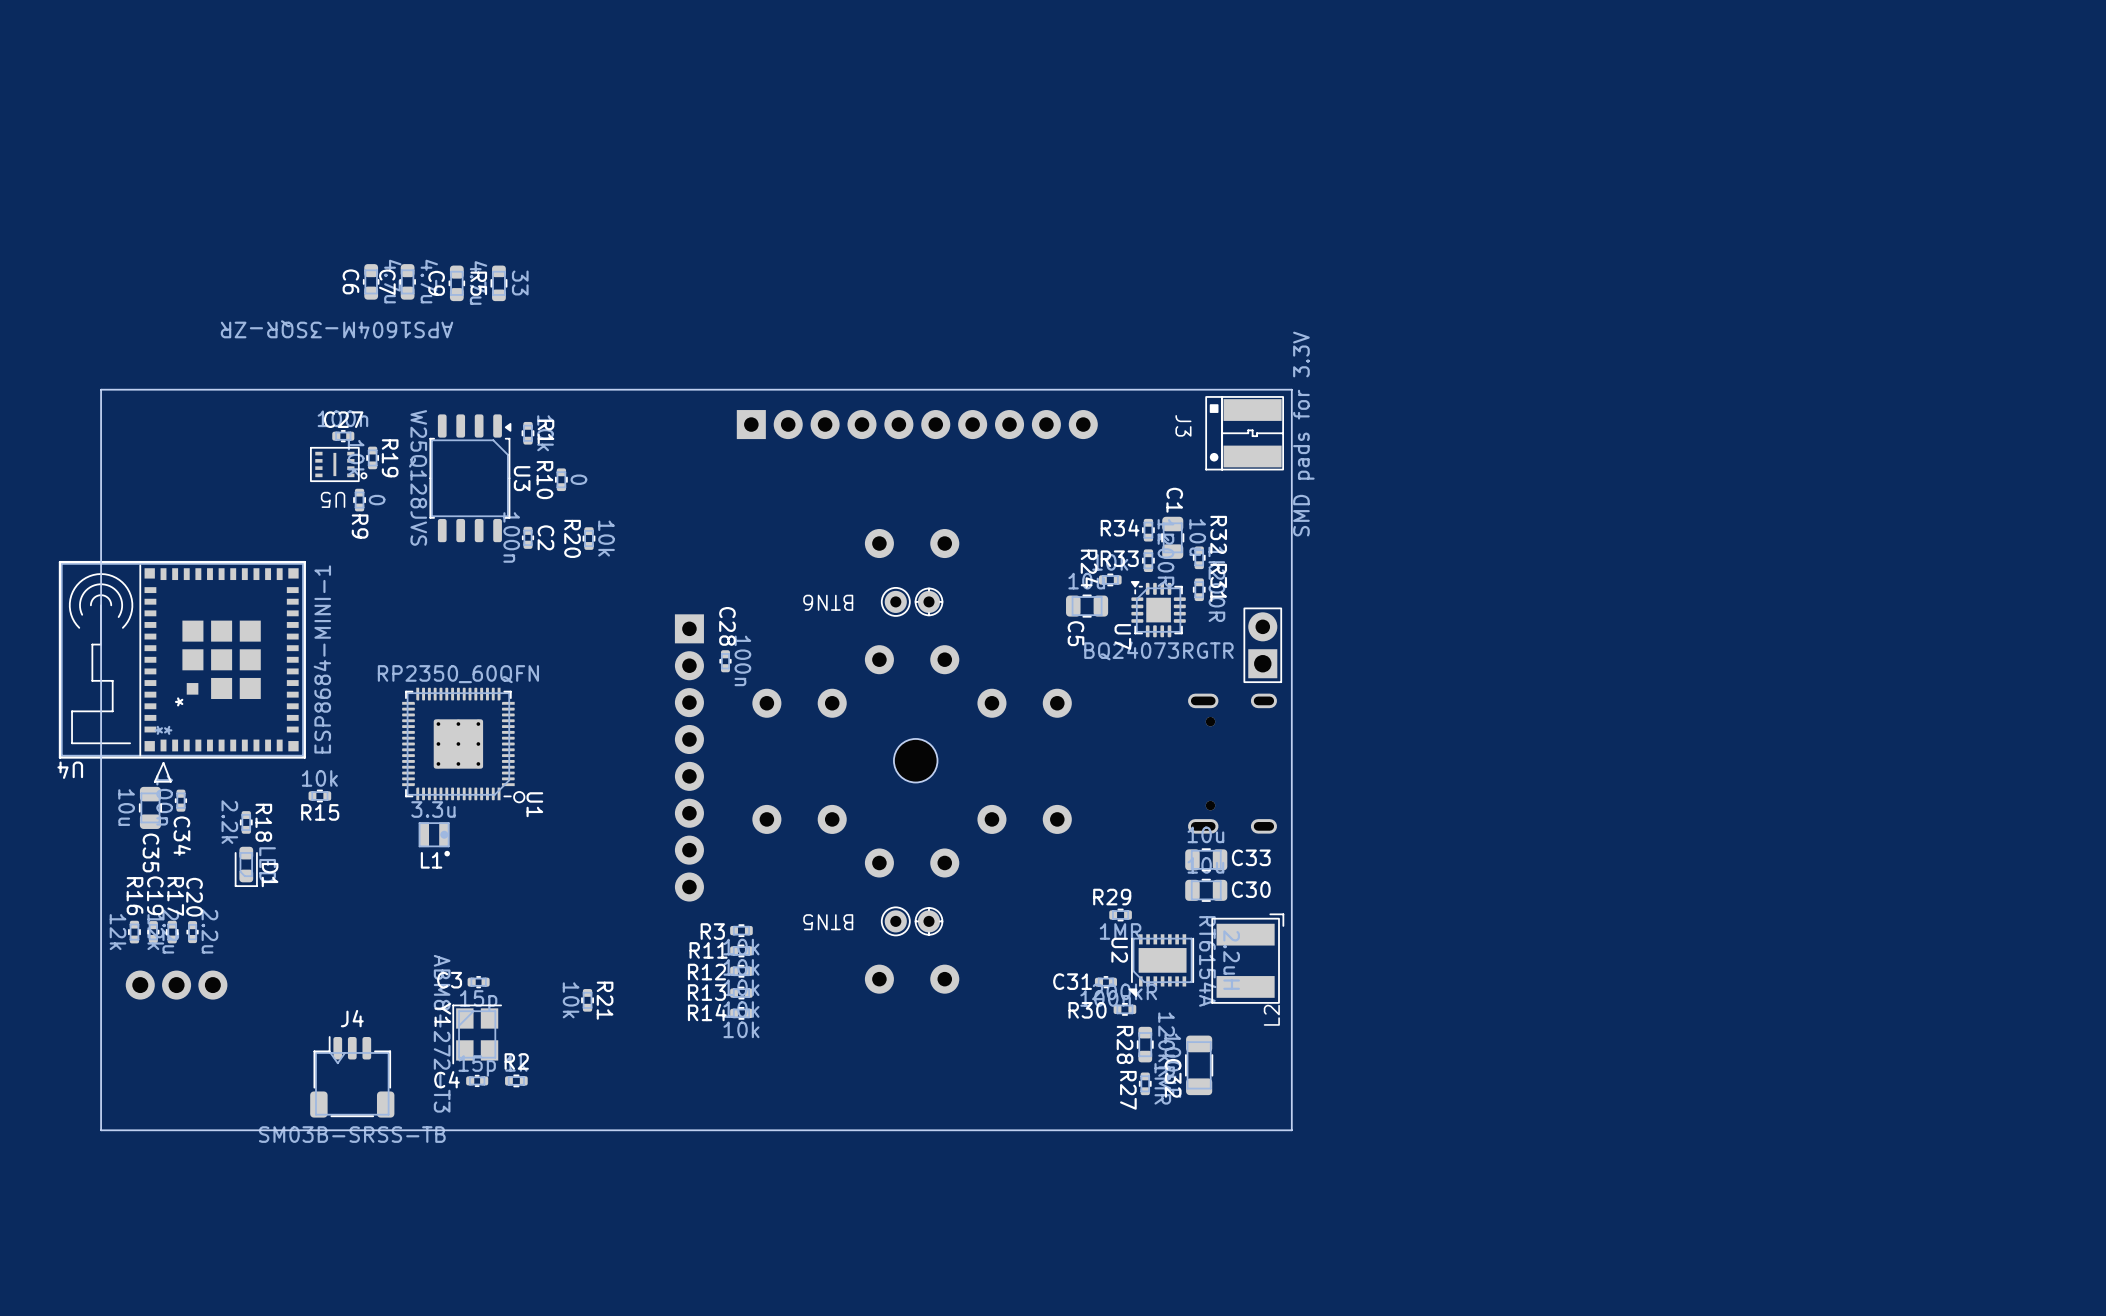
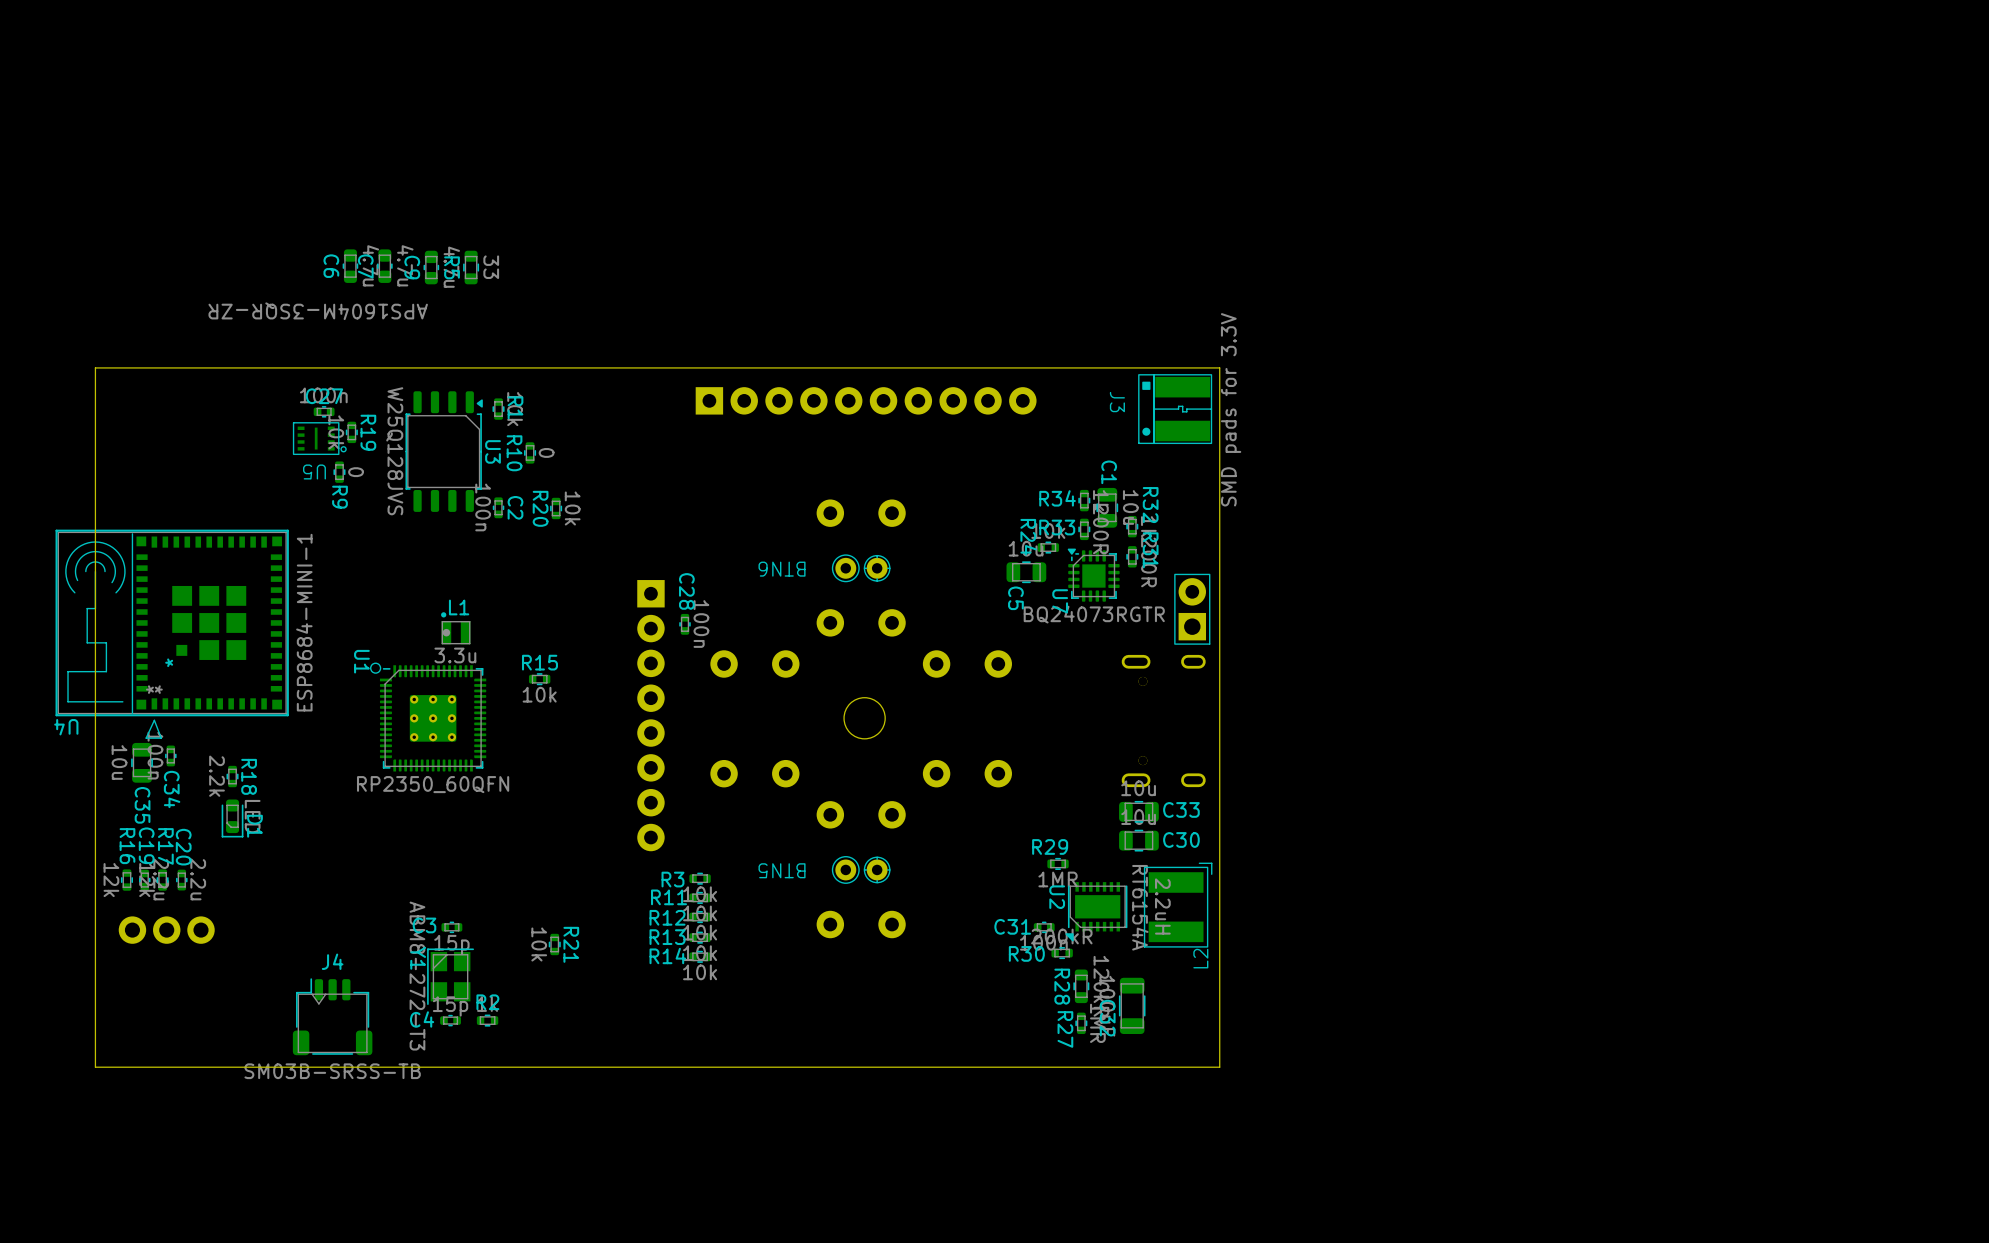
U1 rotation: 0° (463, 745) -> 180° (428, 717)
R15 value position: 10k (319, 778) -> 10k (539, 694)
R15 position: (319, 795) -> (539, 679)
R15 name position: R15 (320, 812) -> R15 (539, 662)
L1 rotation: 0° (434, 839) -> 180° (455, 628)
L1 position: (434, 839) -> (455, 628)

